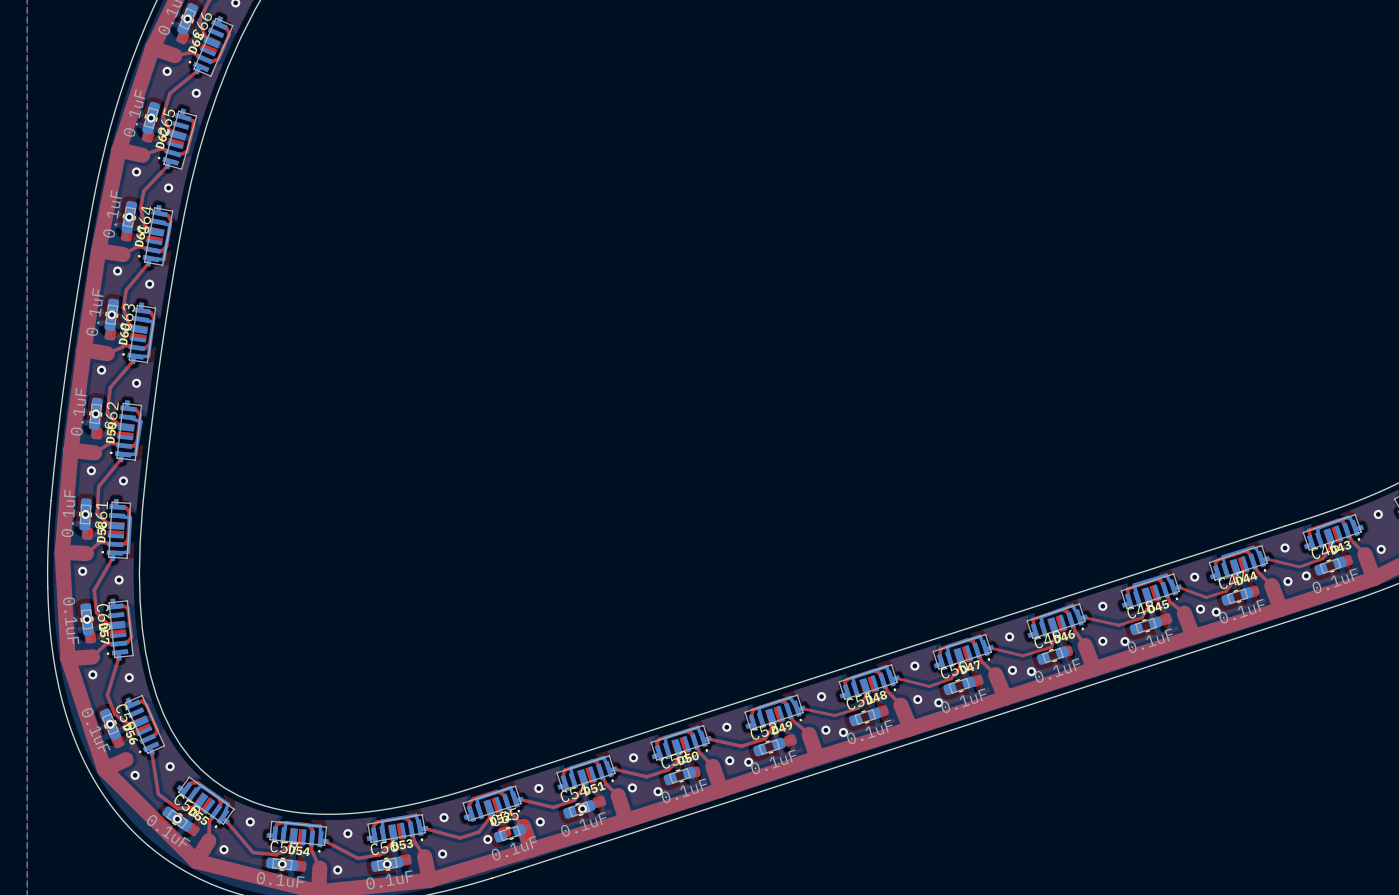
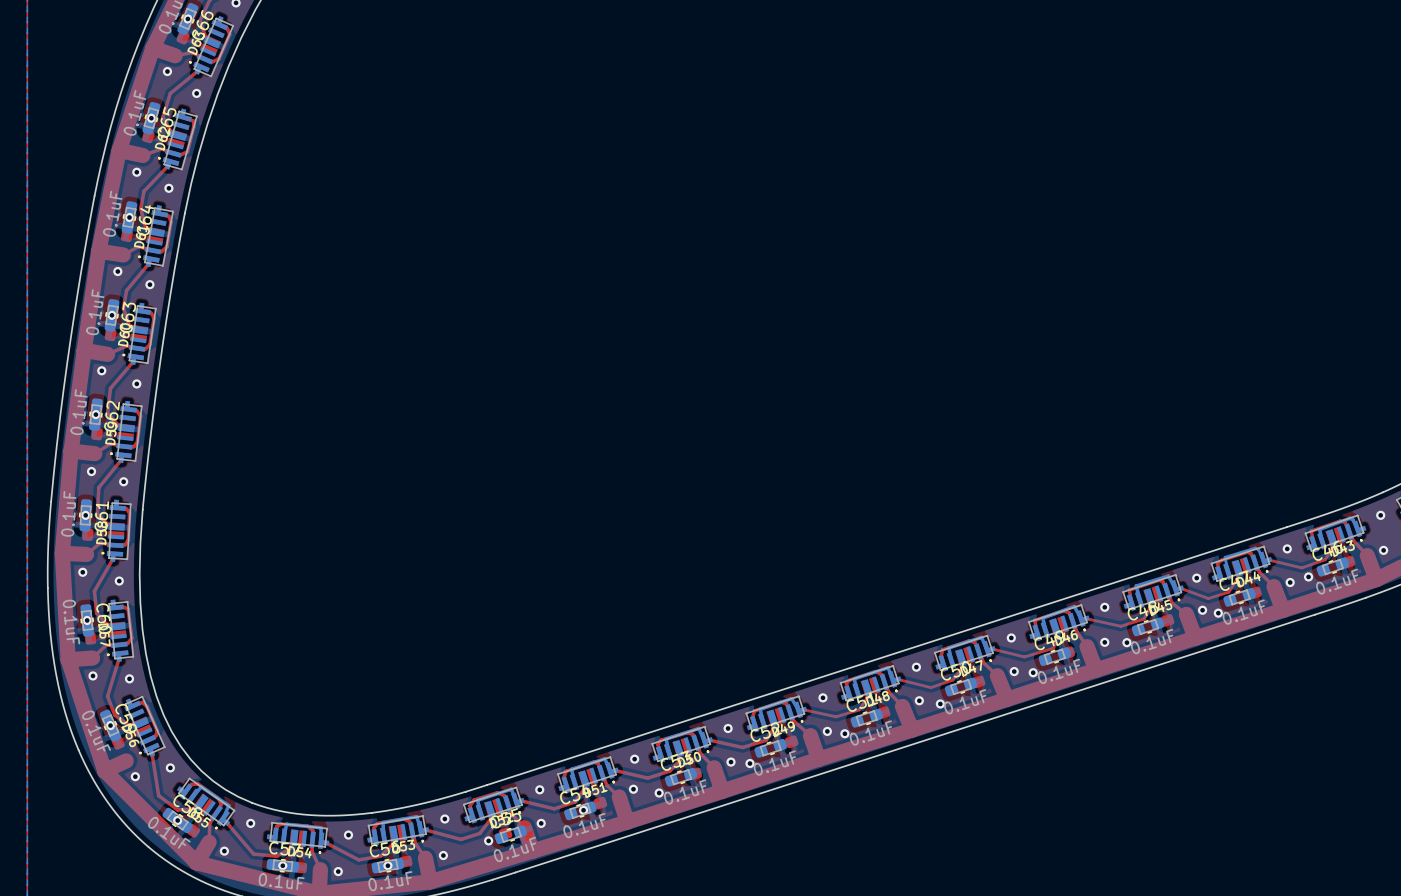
bottom track: (157, 221) (170, 225) (163, 259) (151, 258) -> none
bottom track: (141, 319) (153, 322) (148, 356) (135, 356) -> none
bottom track: (127, 417) (140, 421) (135, 454) (123, 454) -> none
bottom track: (117, 515) (130, 517) (128, 552) (114, 552) -> none

